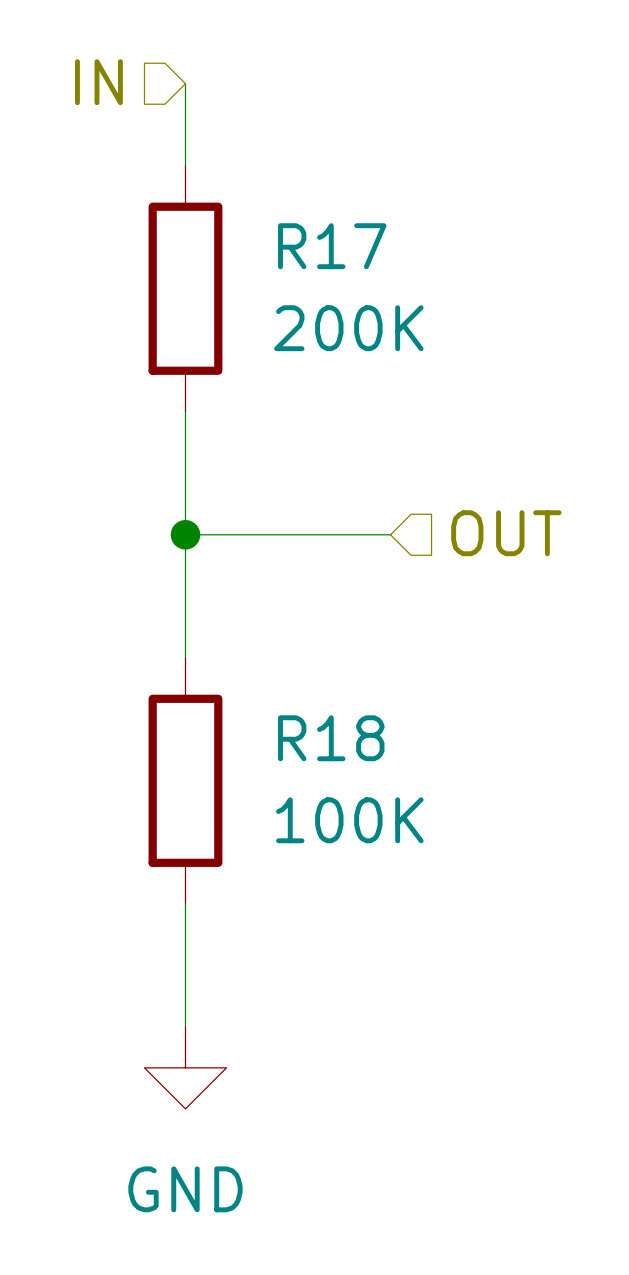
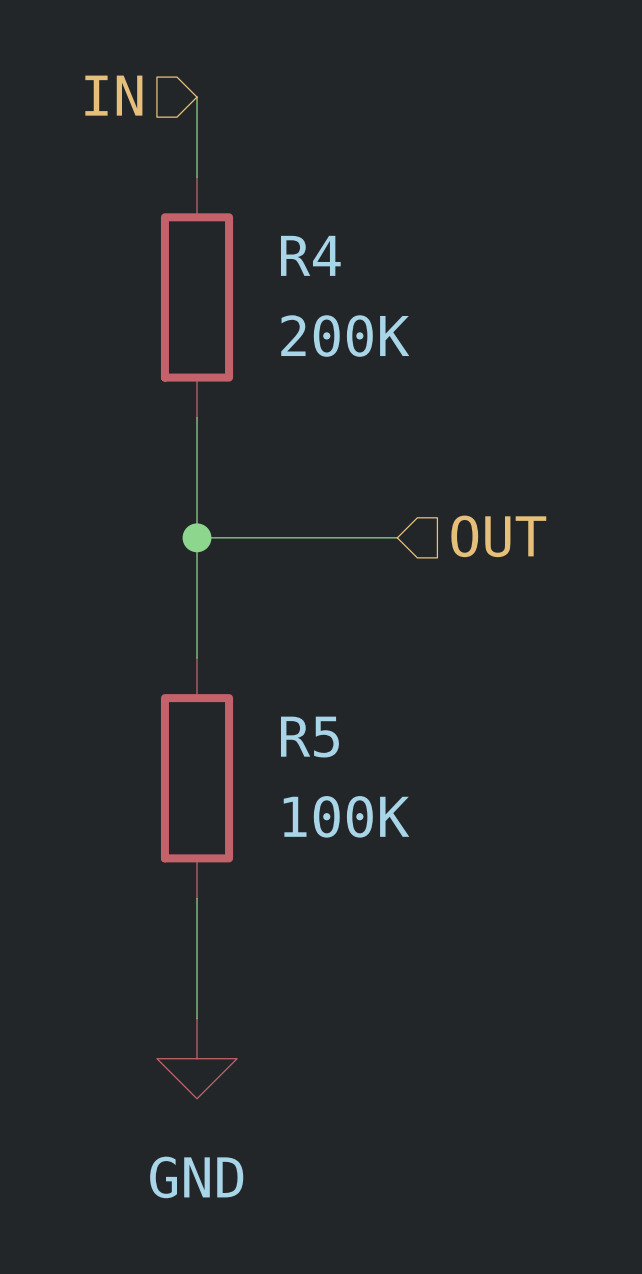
R17 name: R17 (332, 246) -> R4 (310, 255)
R18 name: R18 (331, 738) -> R5 (309, 737)

